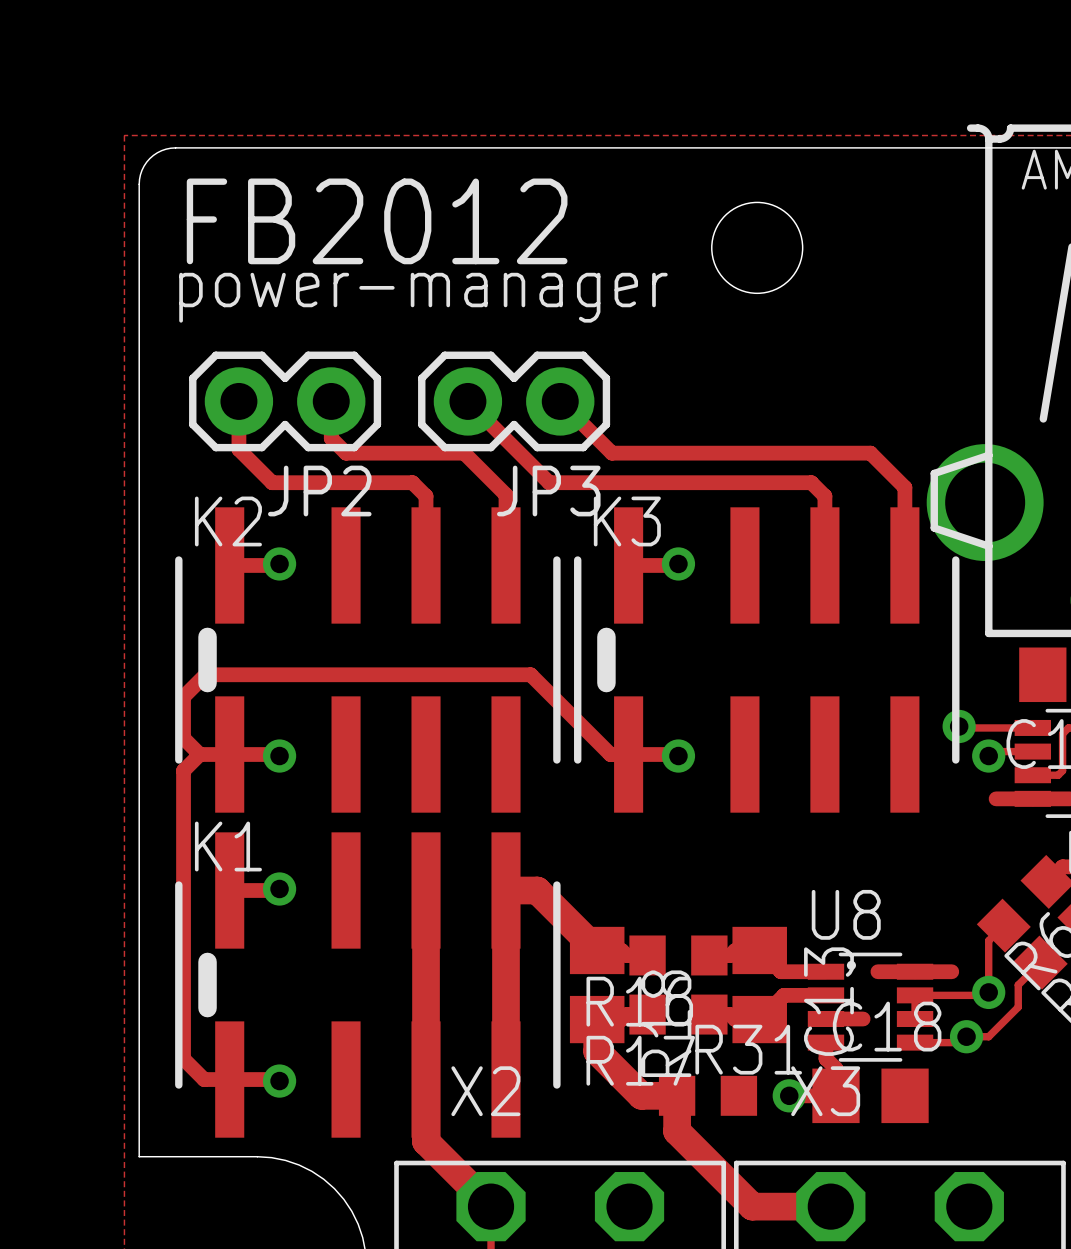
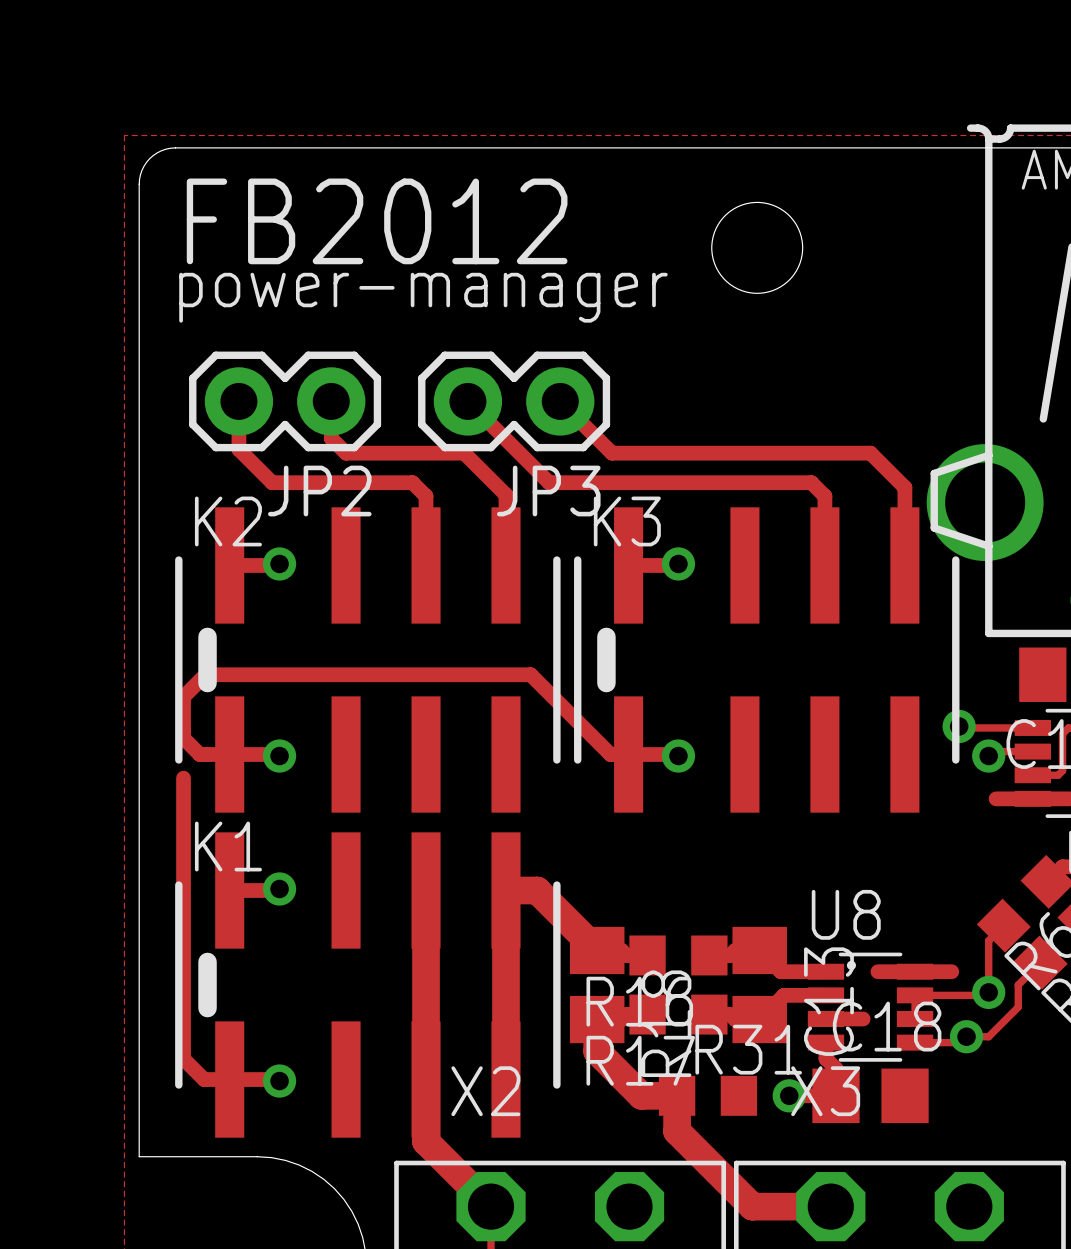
track: (199, 754) (183, 770) (183, 778) -> none

